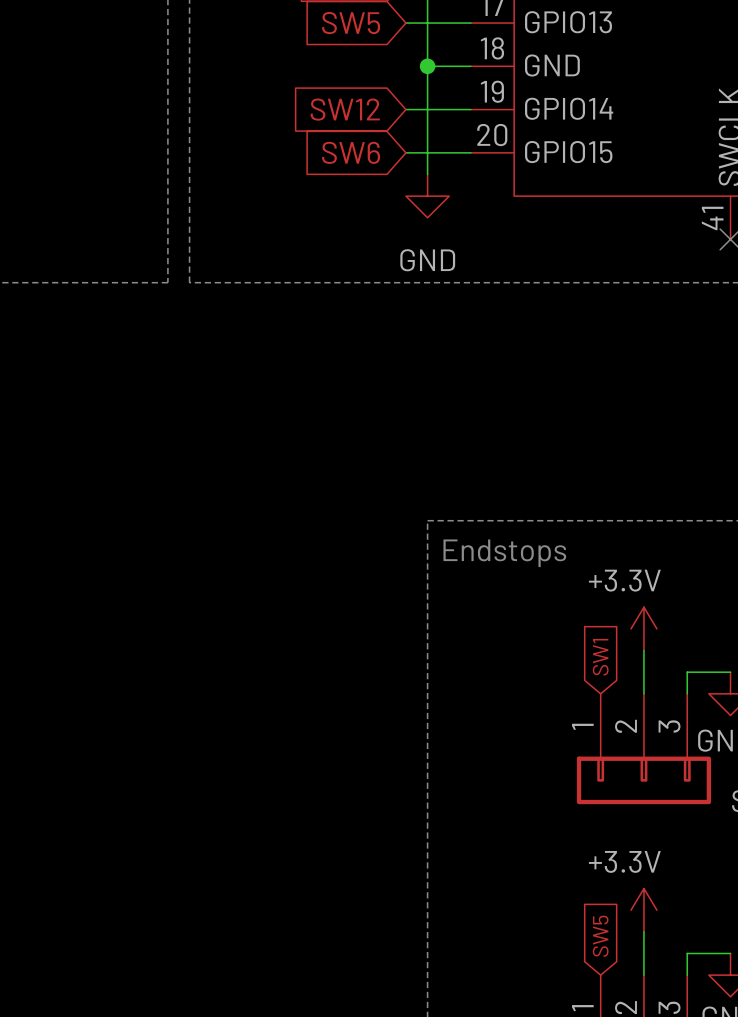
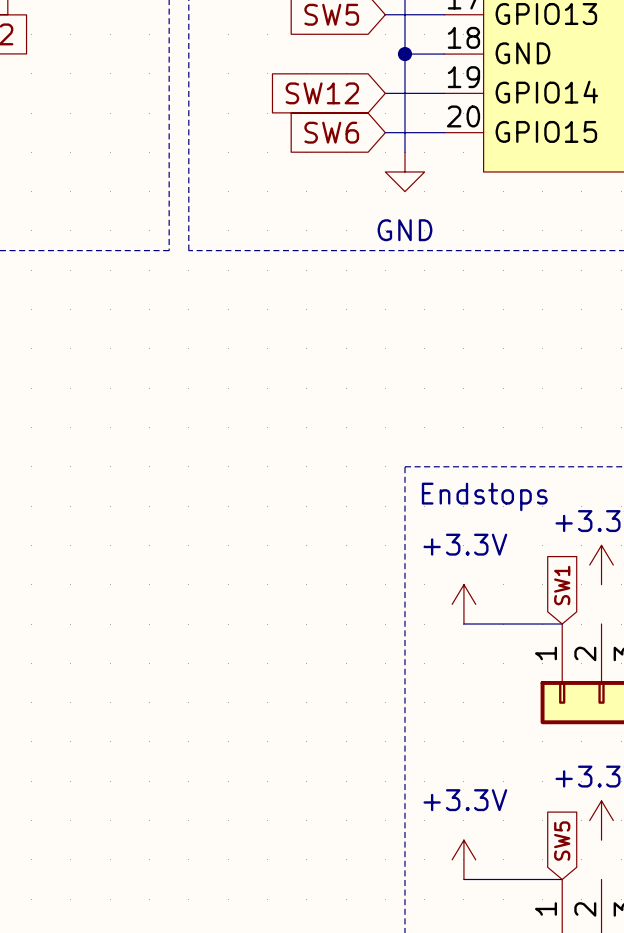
wire: (643, 650) (643, 693) -> none
power symbol: none -> +3.3V (463, 604)
wire: none -> (463, 624) (562, 624)
wire: (643, 931) (643, 975) -> none
power symbol: none -> +3.3V (463, 859)
wire: none -> (463, 879) (562, 879)

